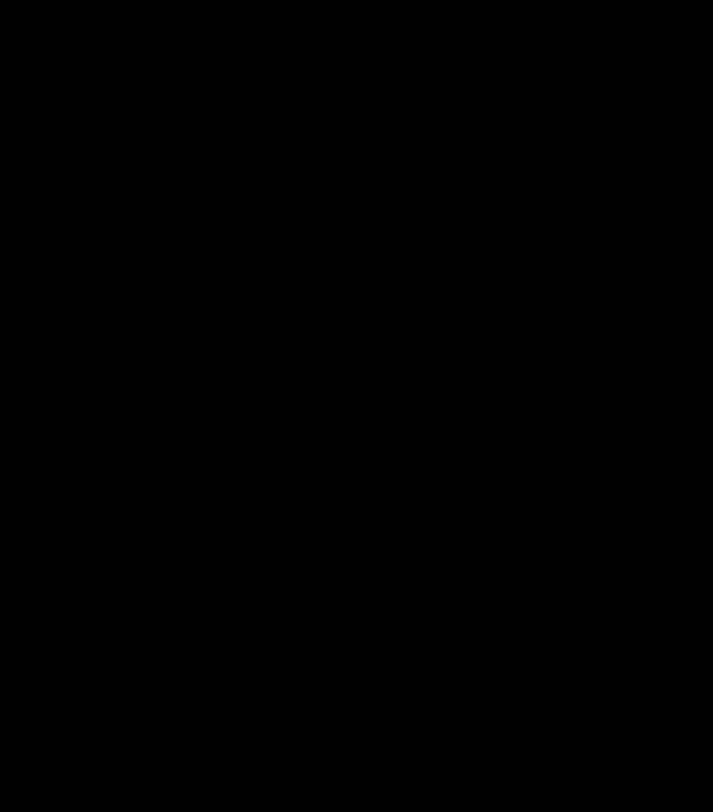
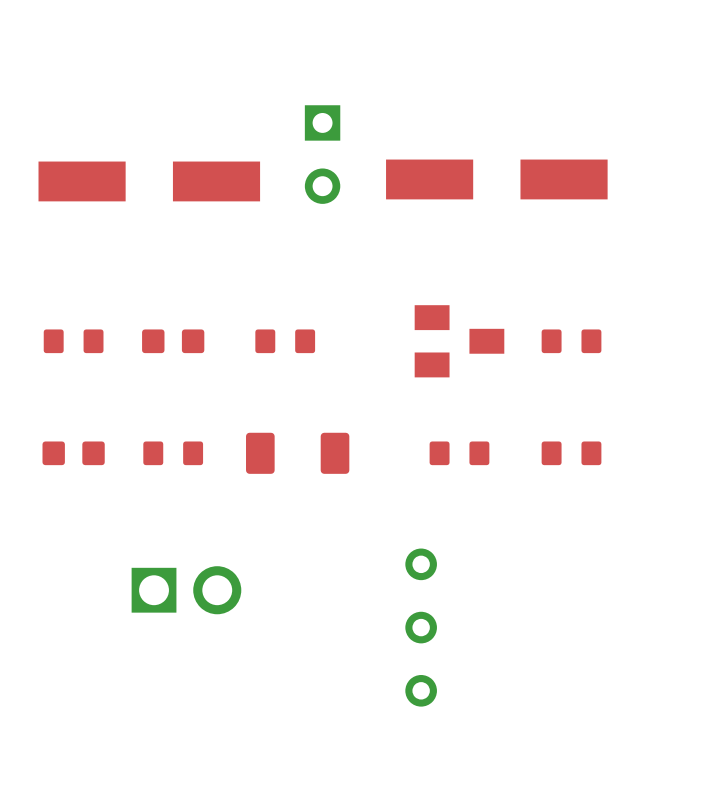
part: none -> (322, 154)
part: none -> (496, 179)
part: none -> (149, 181)
part: none -> (73, 341)
part: none -> (173, 341)
part: none -> (285, 341)
part: none -> (459, 341)
part: none -> (571, 341)
part: none -> (73, 453)
part: none -> (173, 453)
part: none -> (297, 453)
part: none -> (459, 453)
part: none -> (571, 453)
part: none -> (186, 590)
part: none -> (421, 627)

